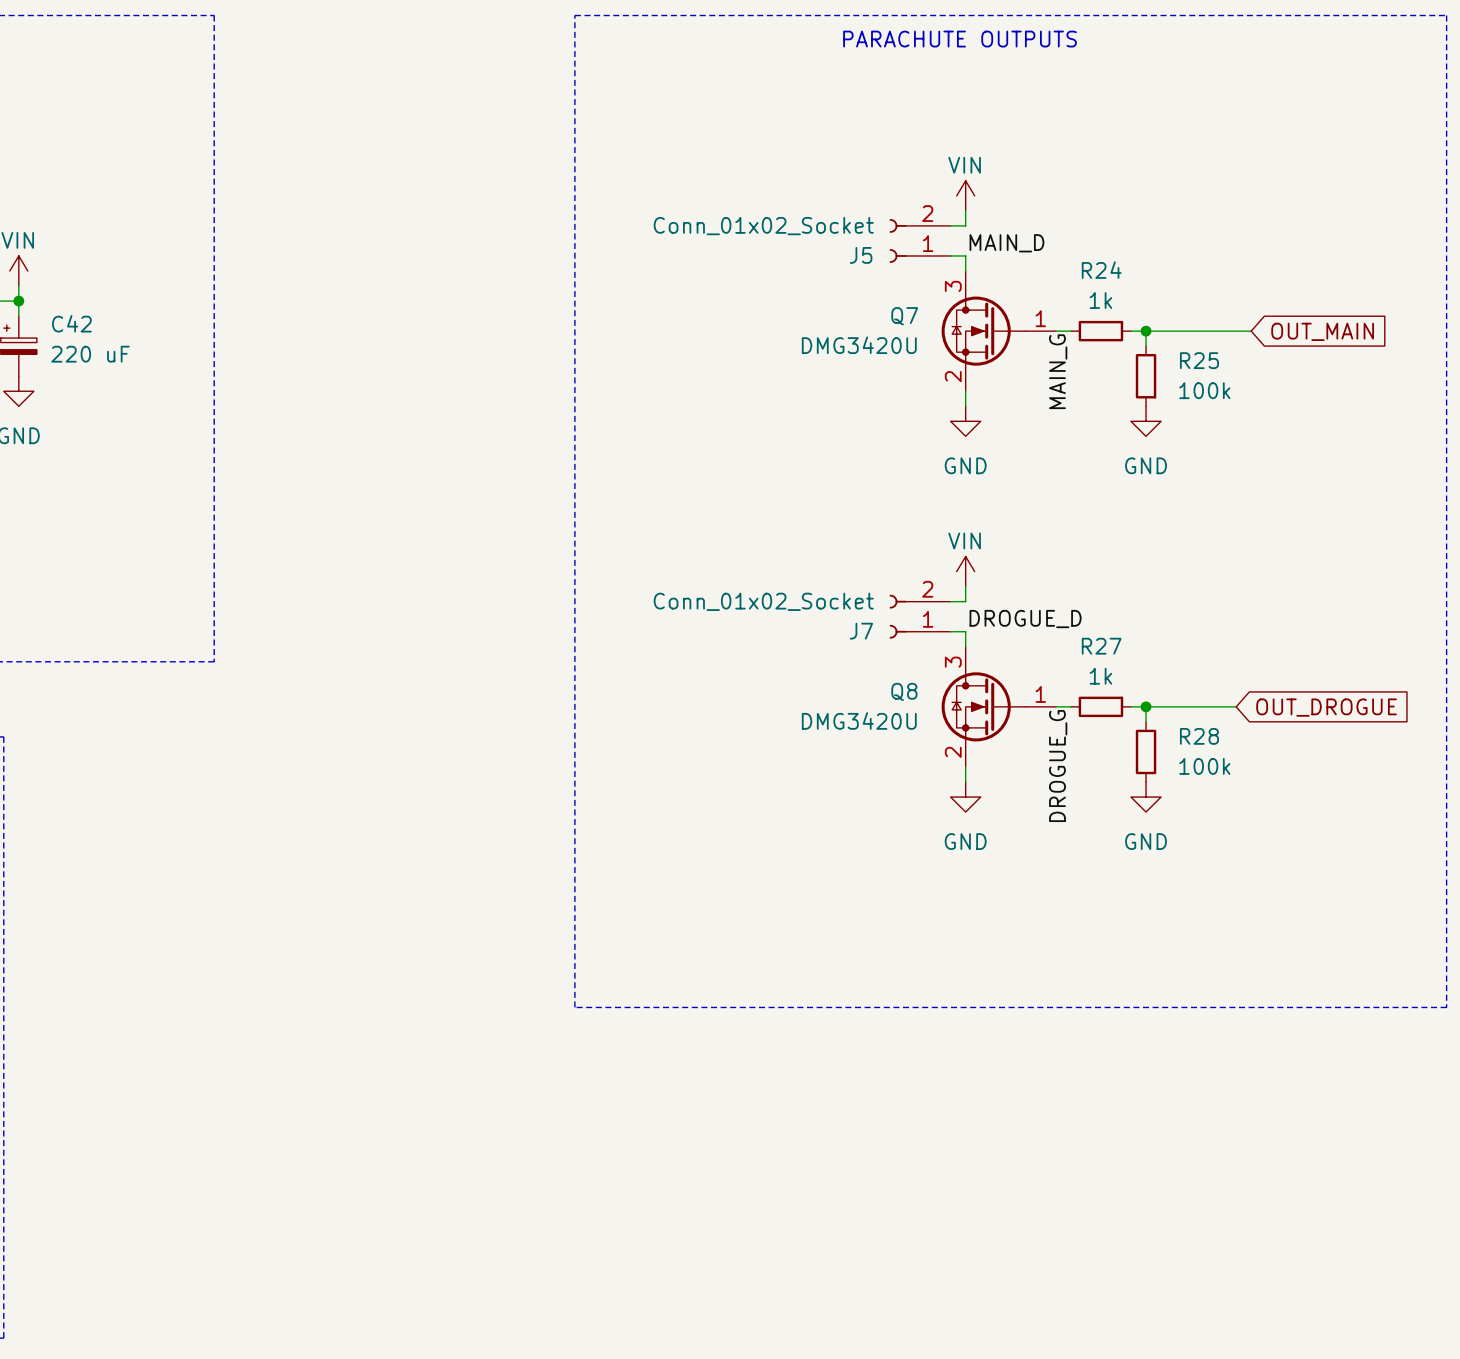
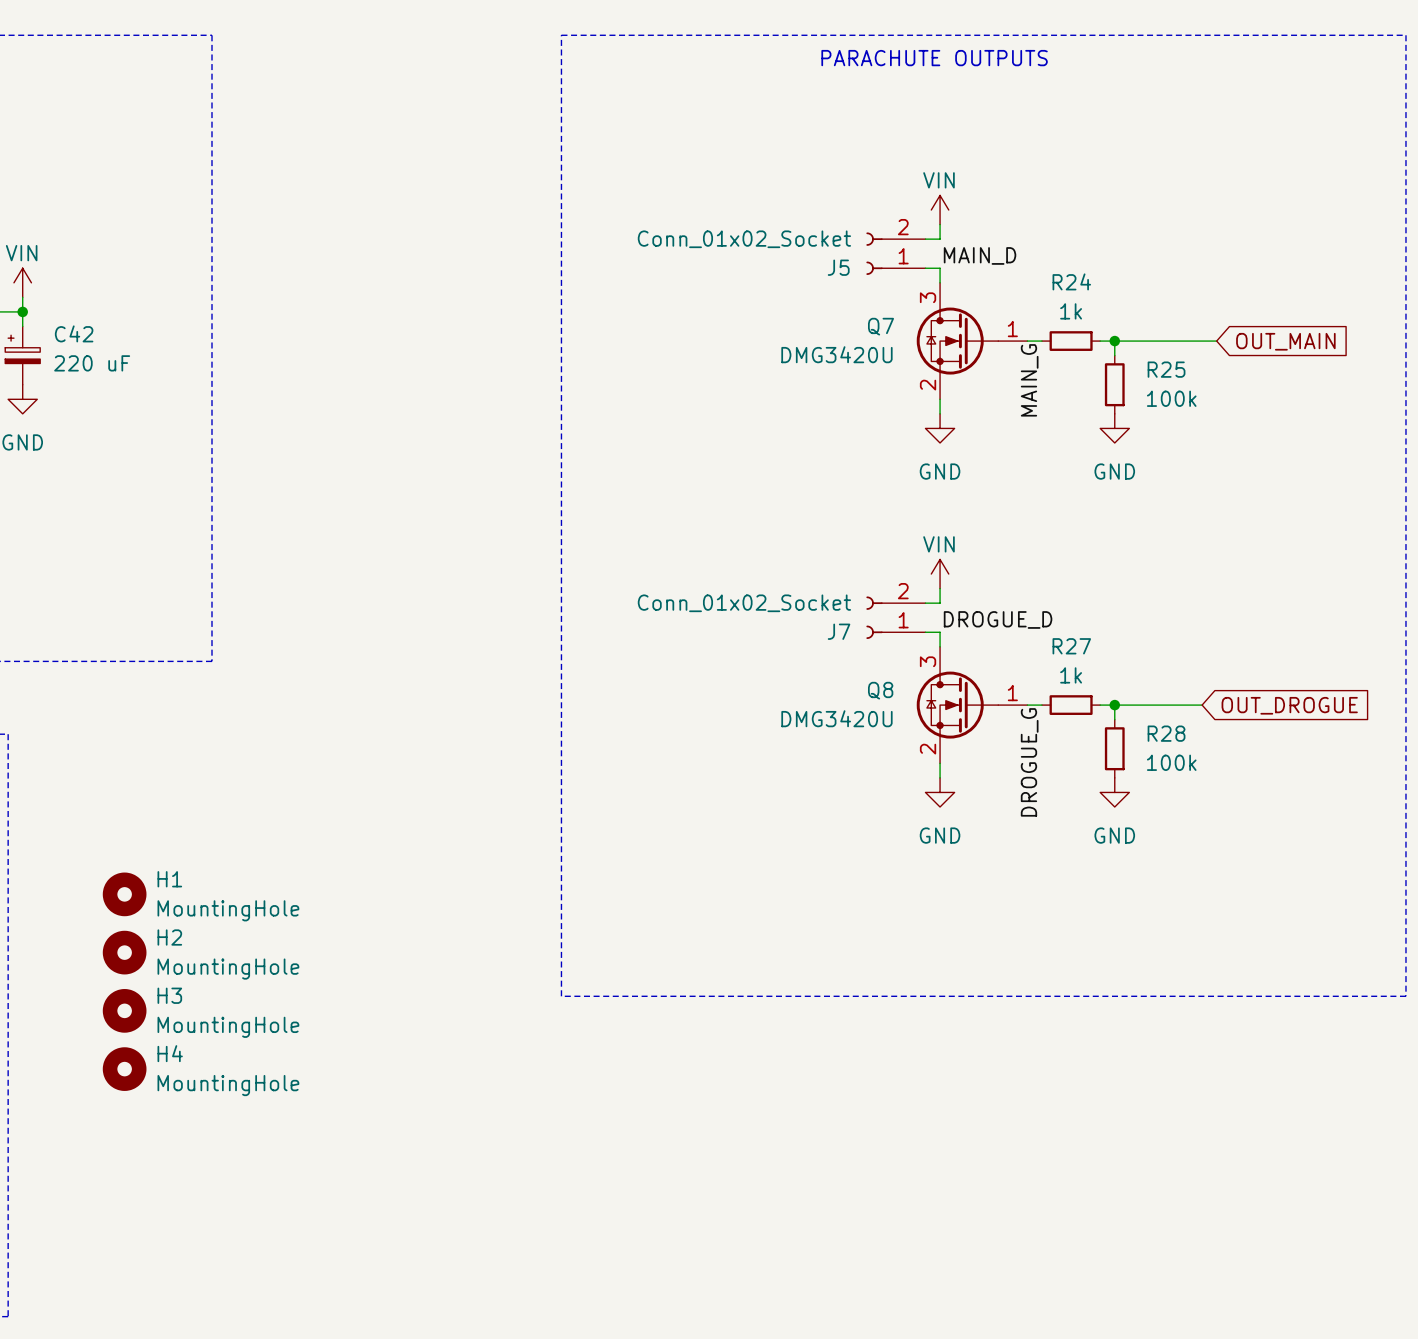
H1: none -> MountingHole (124, 894)
H2: none -> MountingHole (124, 952)
H3: none -> MountingHole (124, 1010)
H4: none -> MountingHole (124, 1069)

